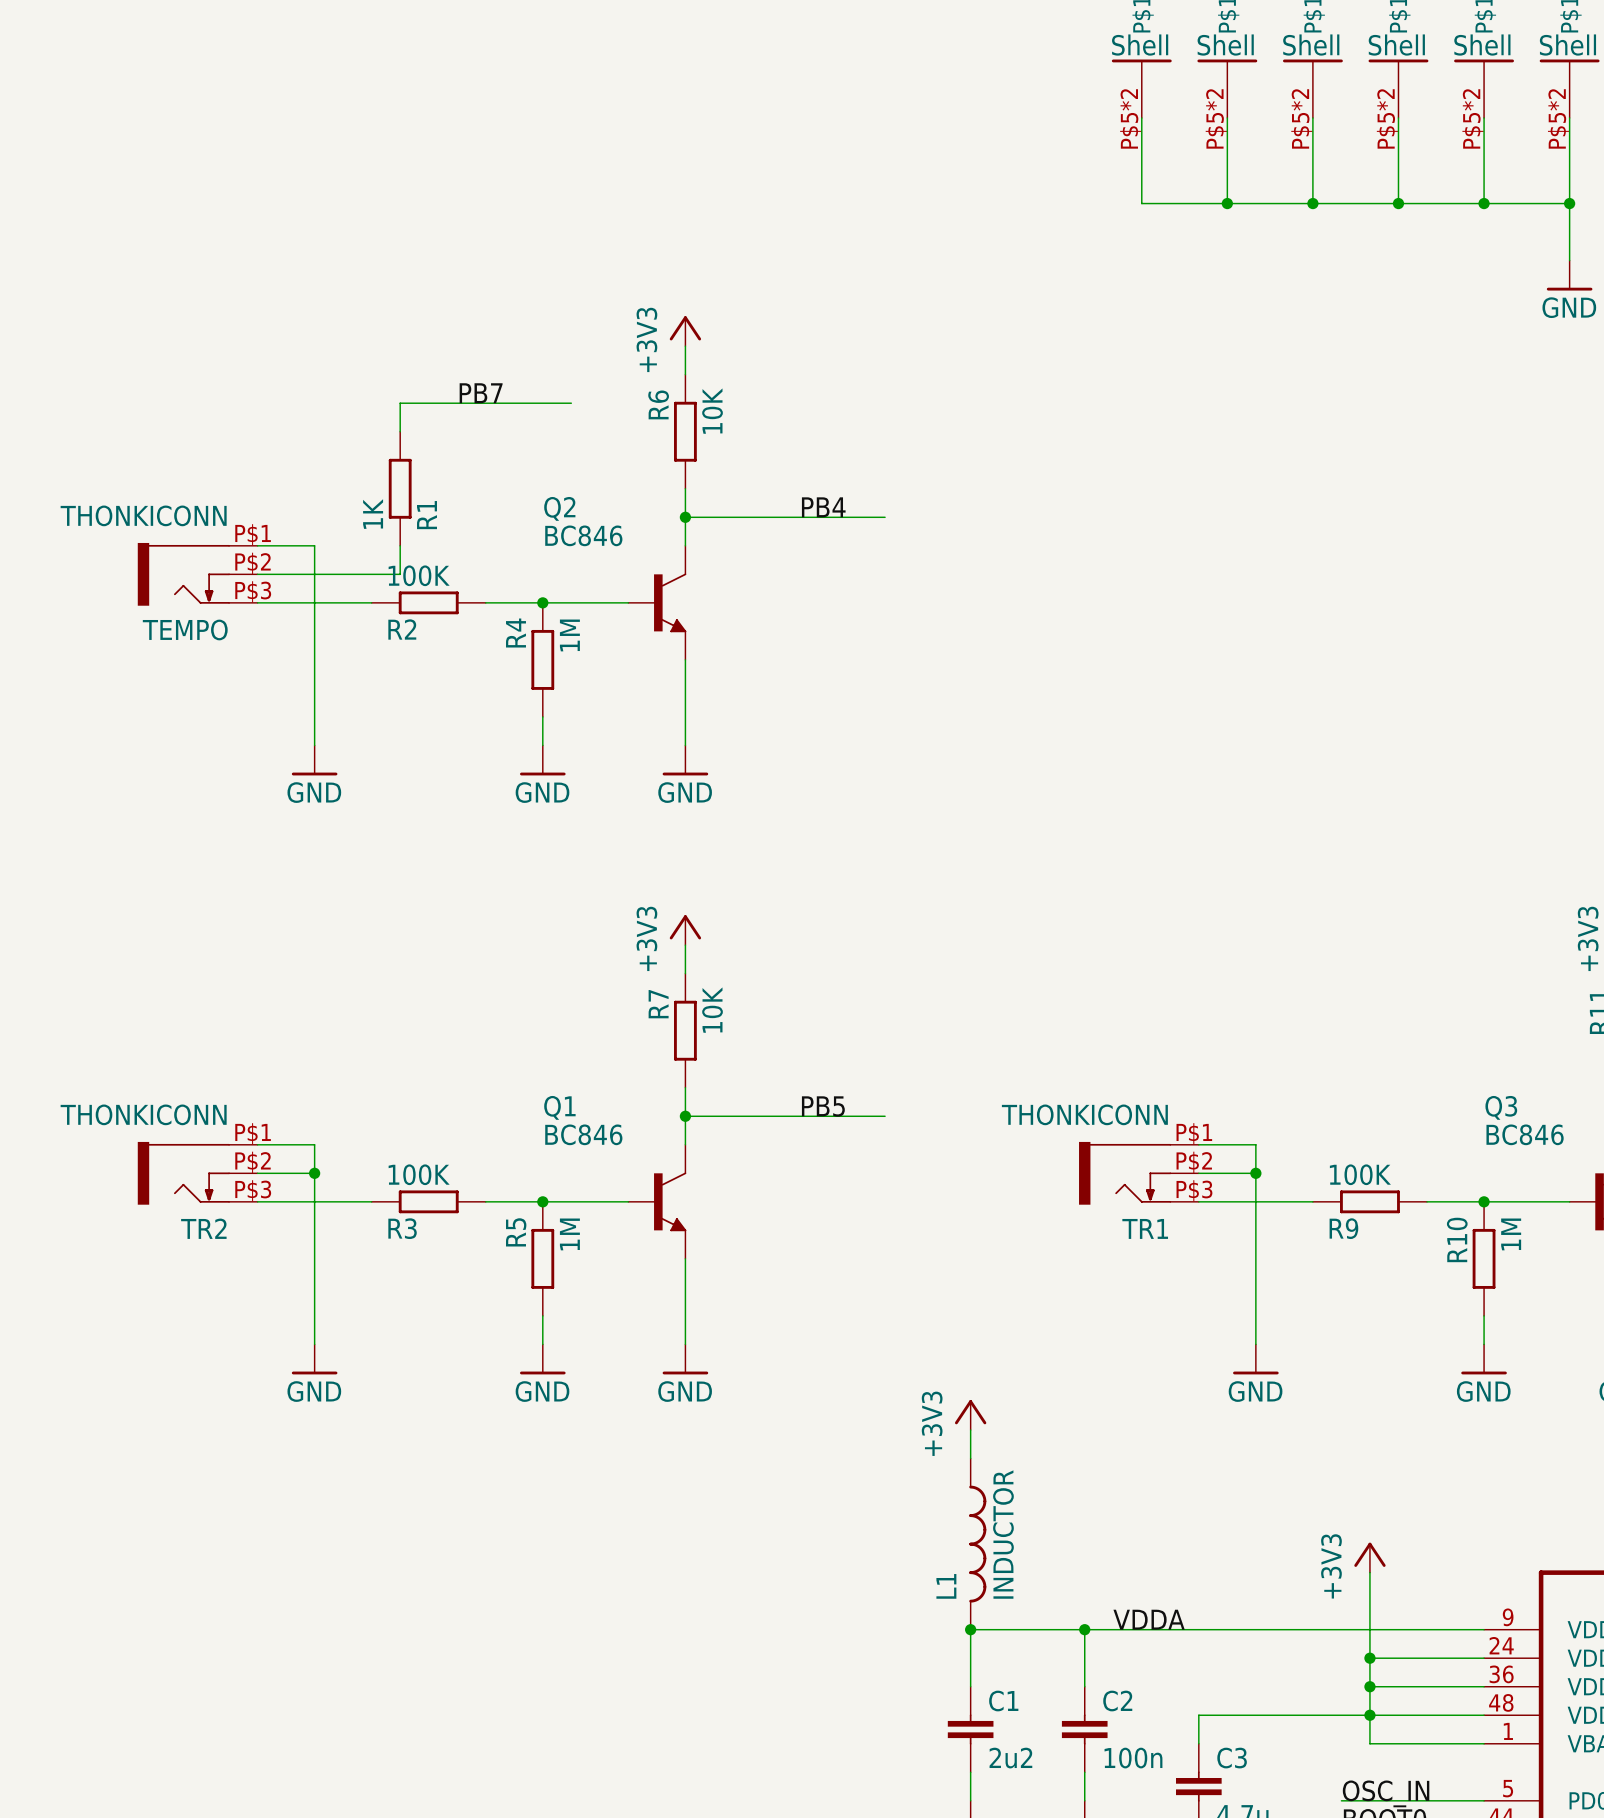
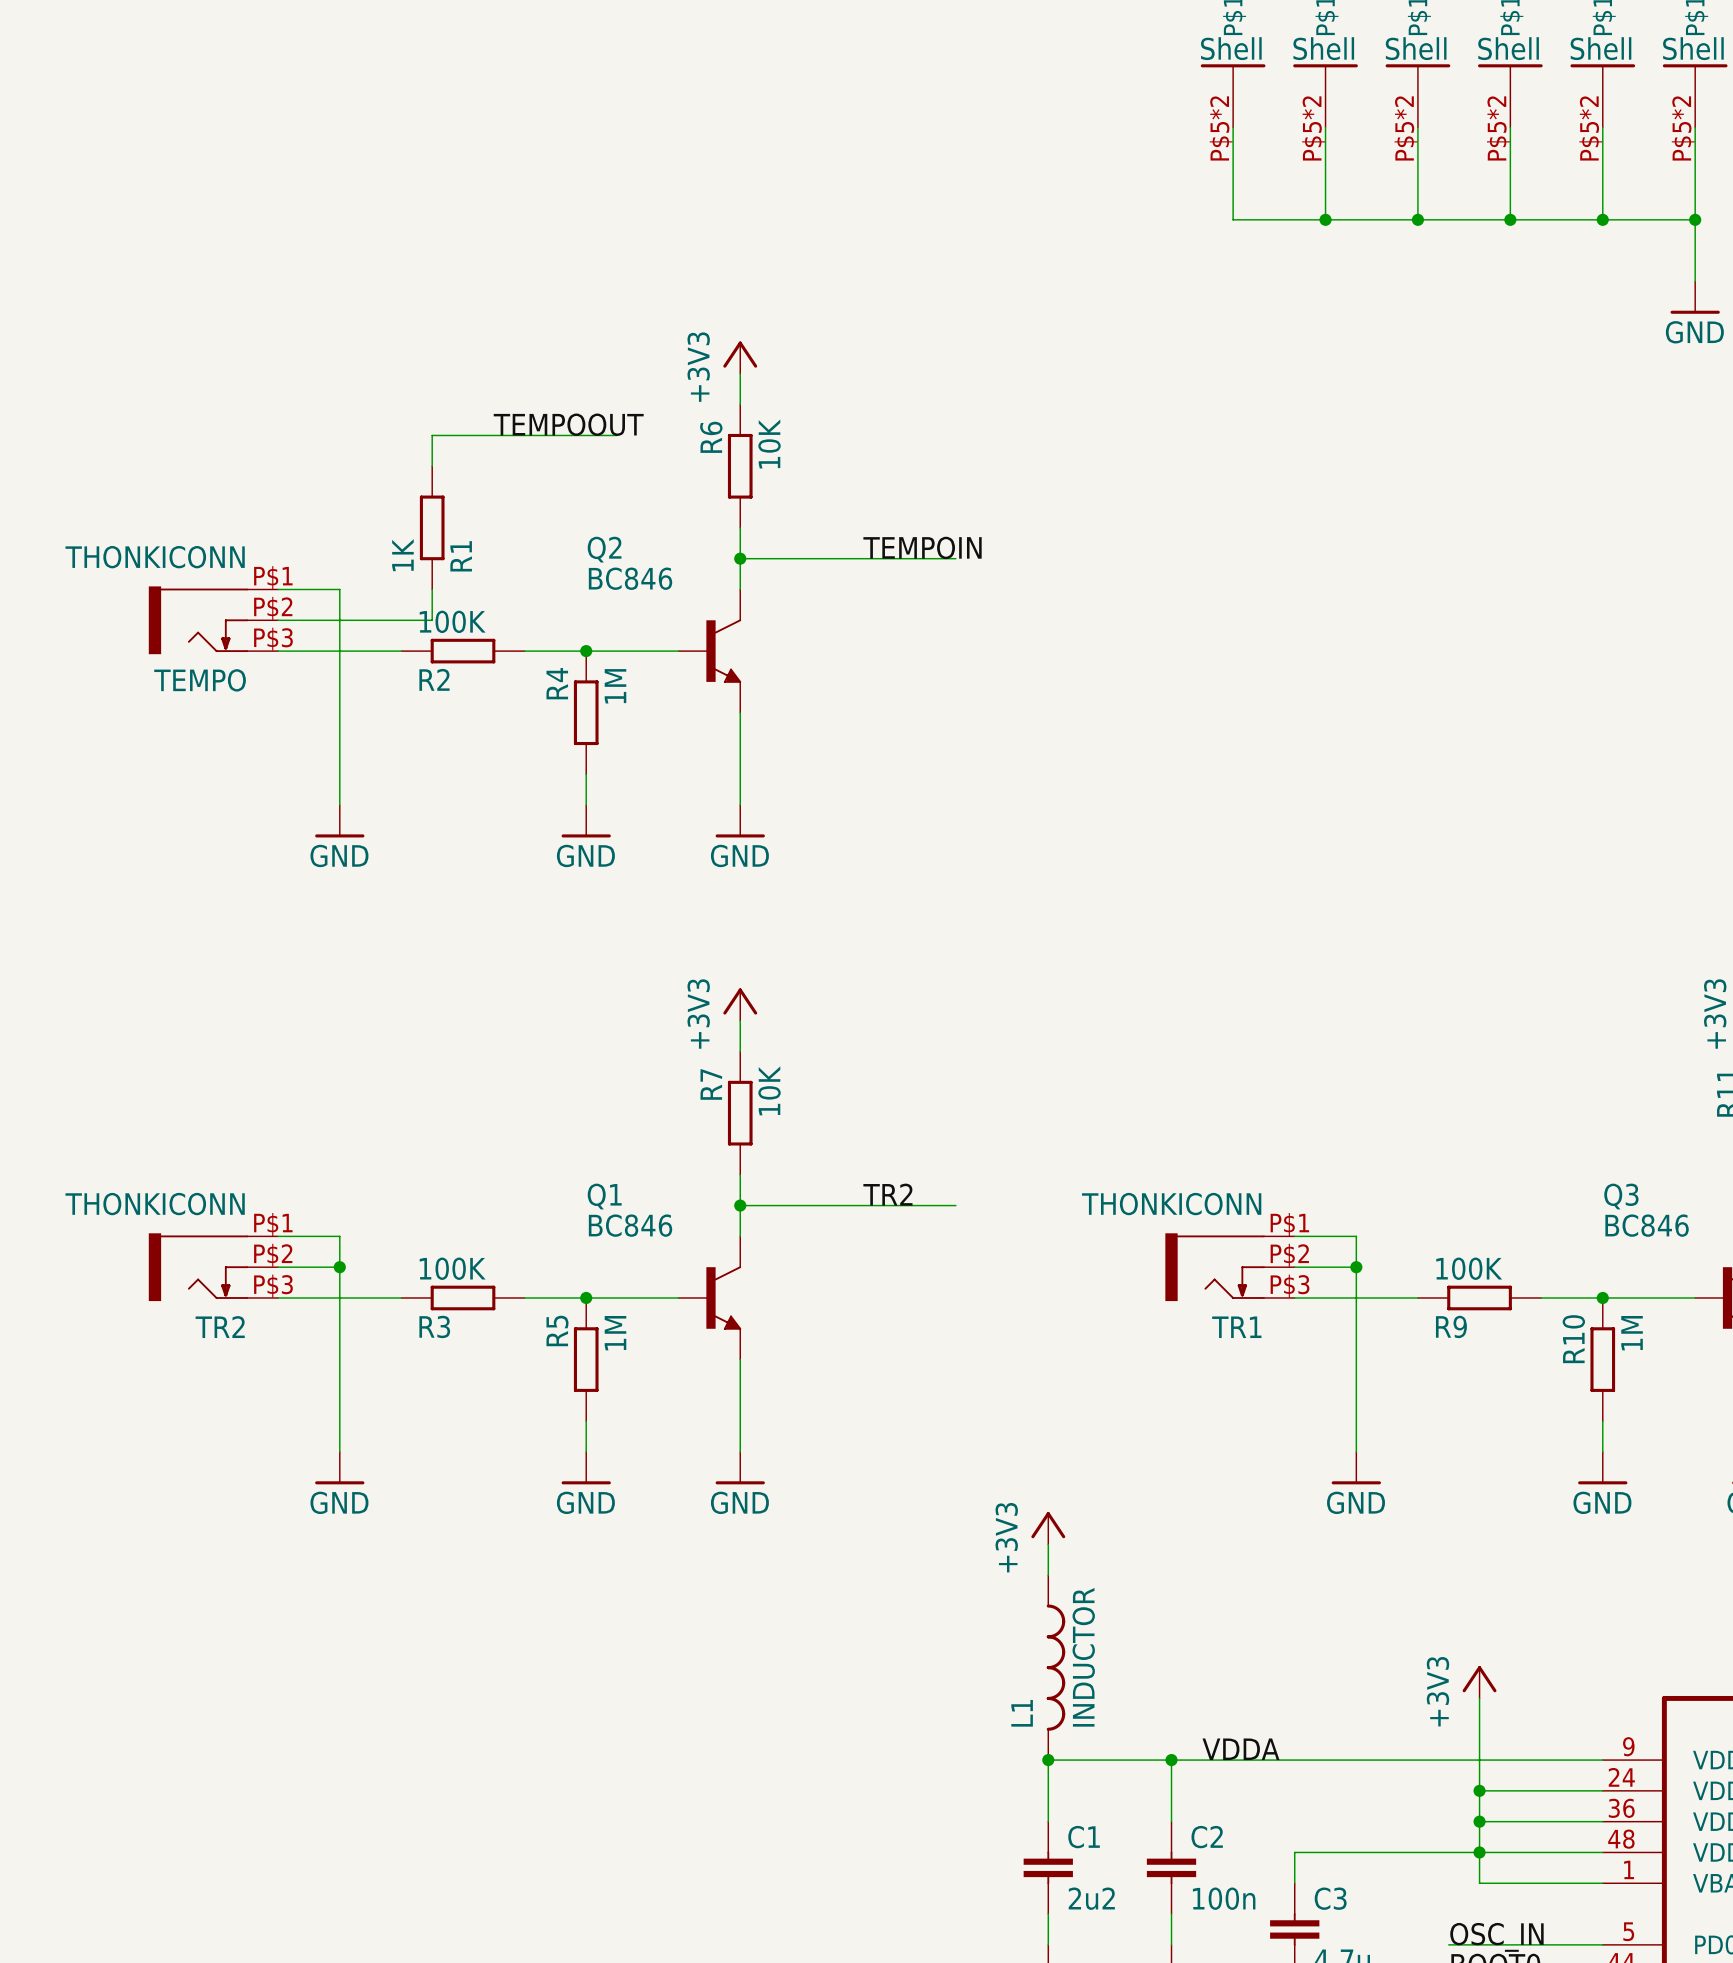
label: PB7 (481, 393) -> TEMPOOUT (568, 424)
label: PB4 (823, 507) -> TEMPOIN (922, 547)
label: PB5 (823, 1106) -> TR2 (887, 1194)

